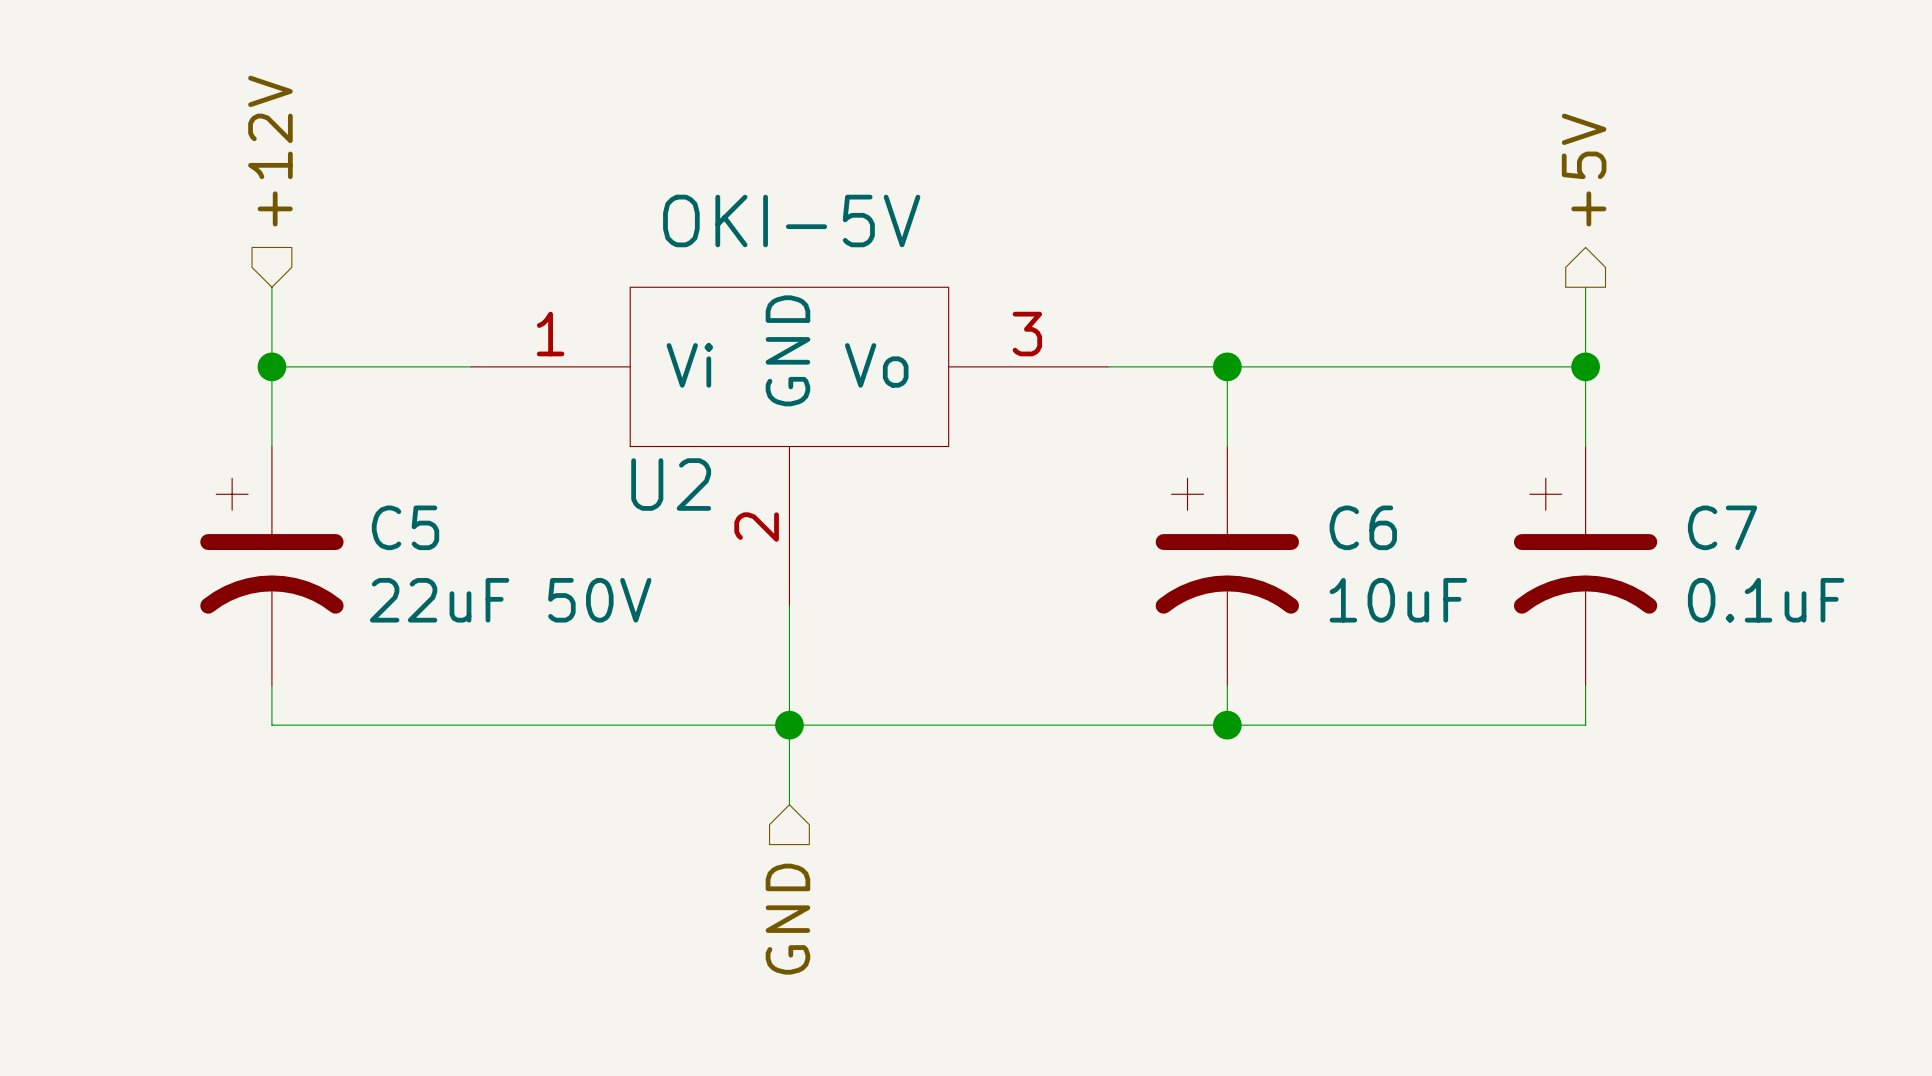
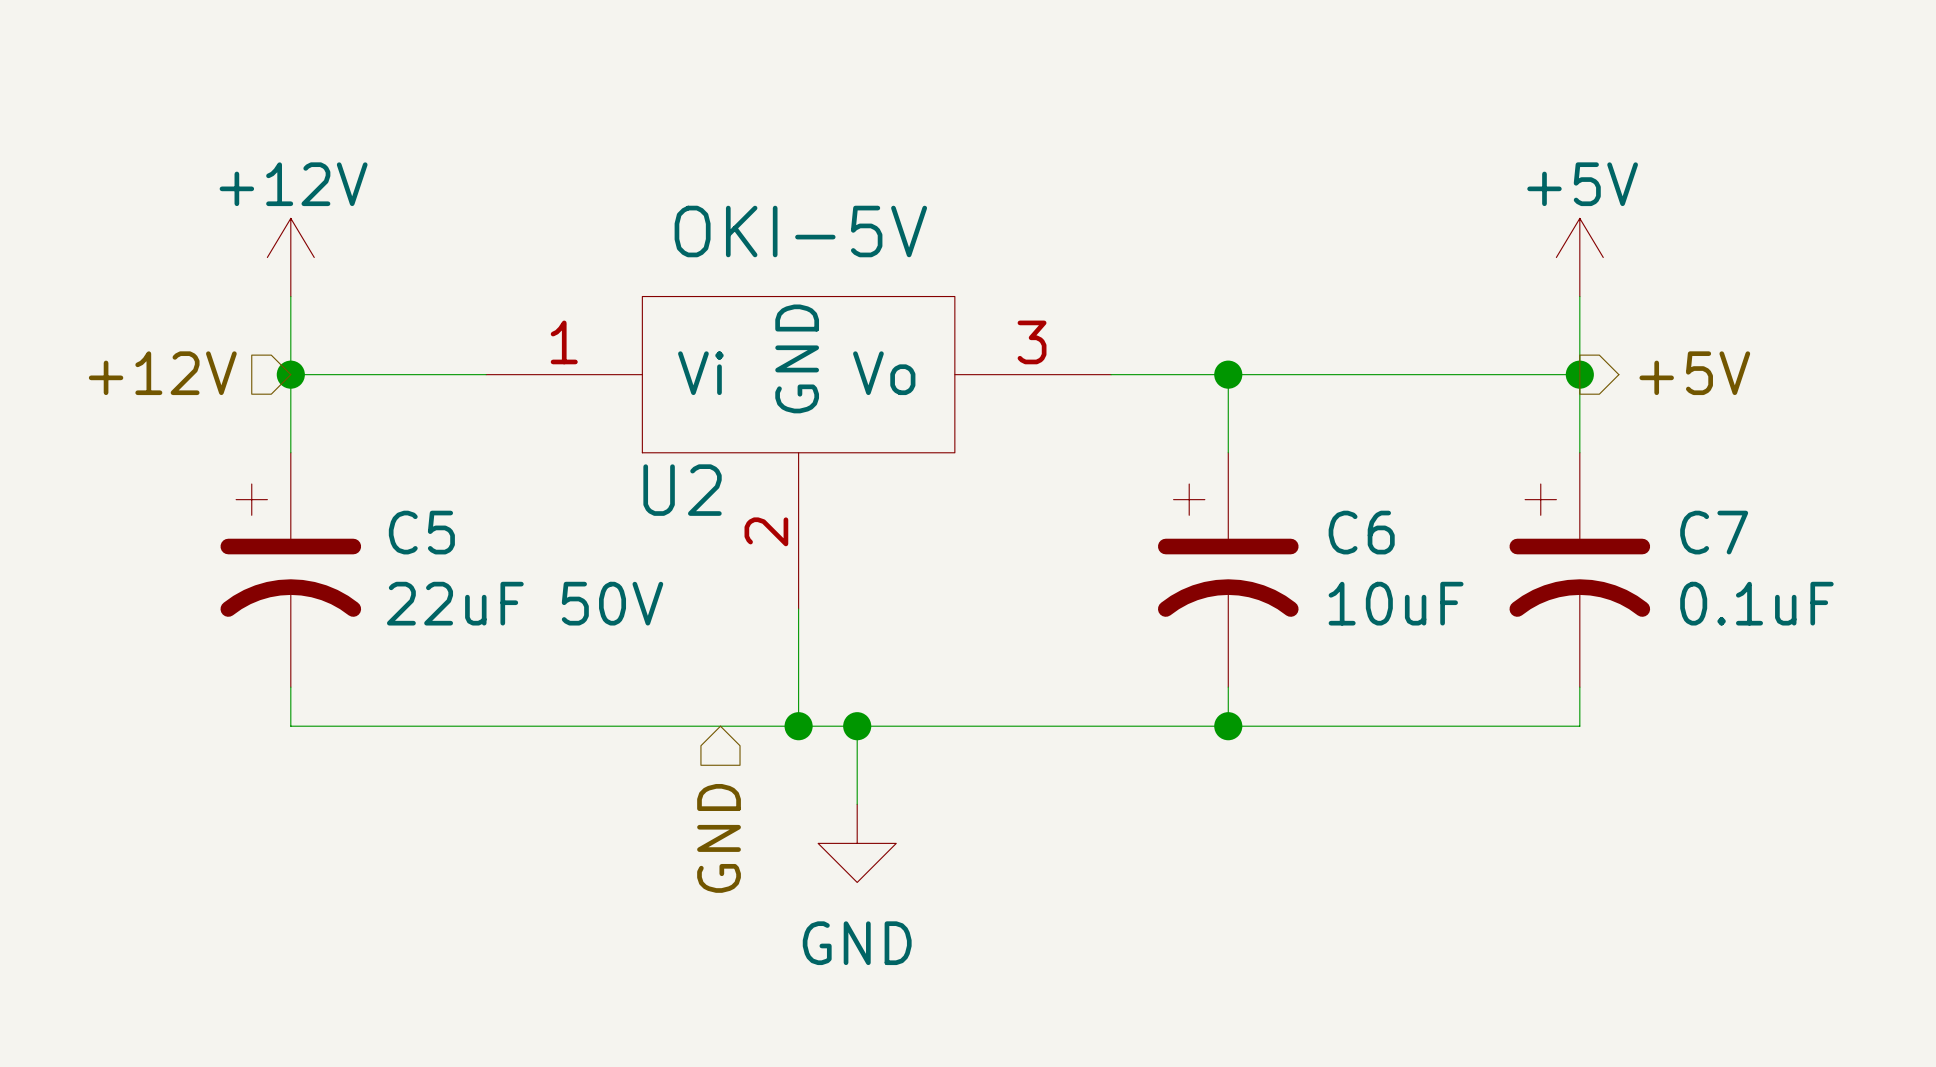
hierarchical label rotation: 0° (270, 151) -> 90° counterclockwise (162, 373)
hierarchical label position: +12V (270, 151) -> +12V (162, 373)
hierarchical label rotation: 0° (1584, 170) -> 90° clockwise (1694, 373)
hierarchical label position: +5V (1584, 170) -> +5V (1694, 373)
power symbol: none -> +12V (290, 257)
power symbol: none -> +5V (1579, 257)
wire: (789, 725) (789, 804) -> (857, 726) (857, 804)
junction: none -> (857, 726)
power symbol: none -> GND (857, 843)
hierarchical label position: GND (787, 919) -> GND (719, 838)

